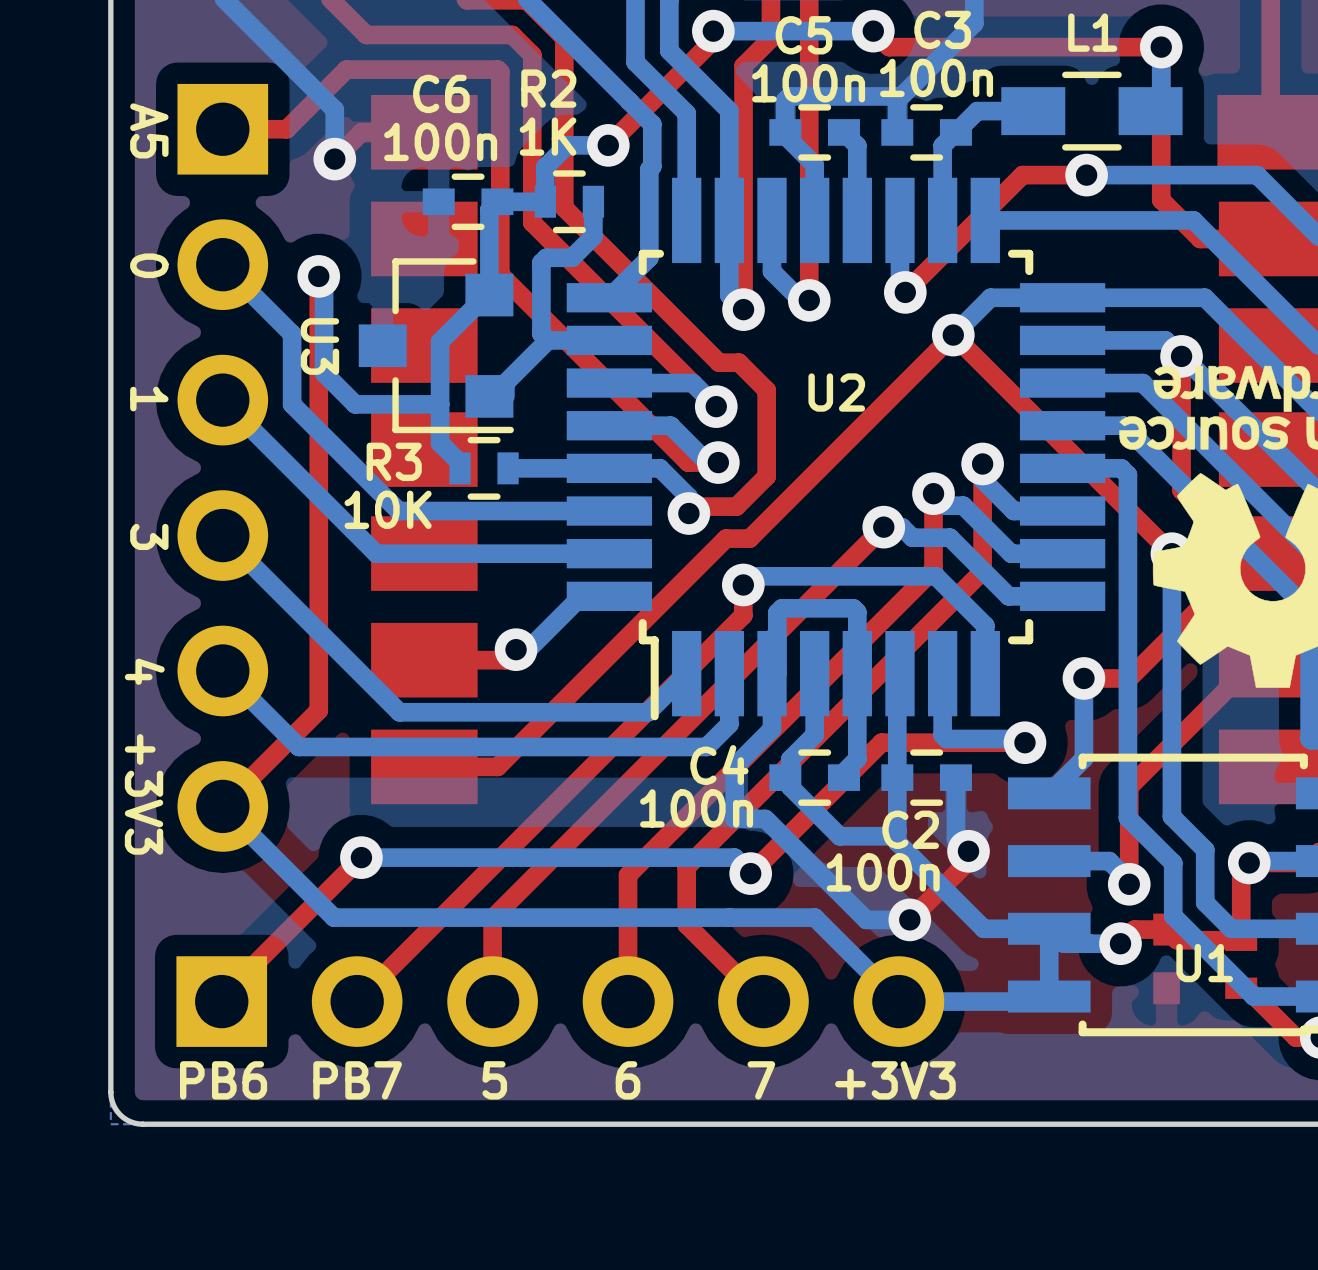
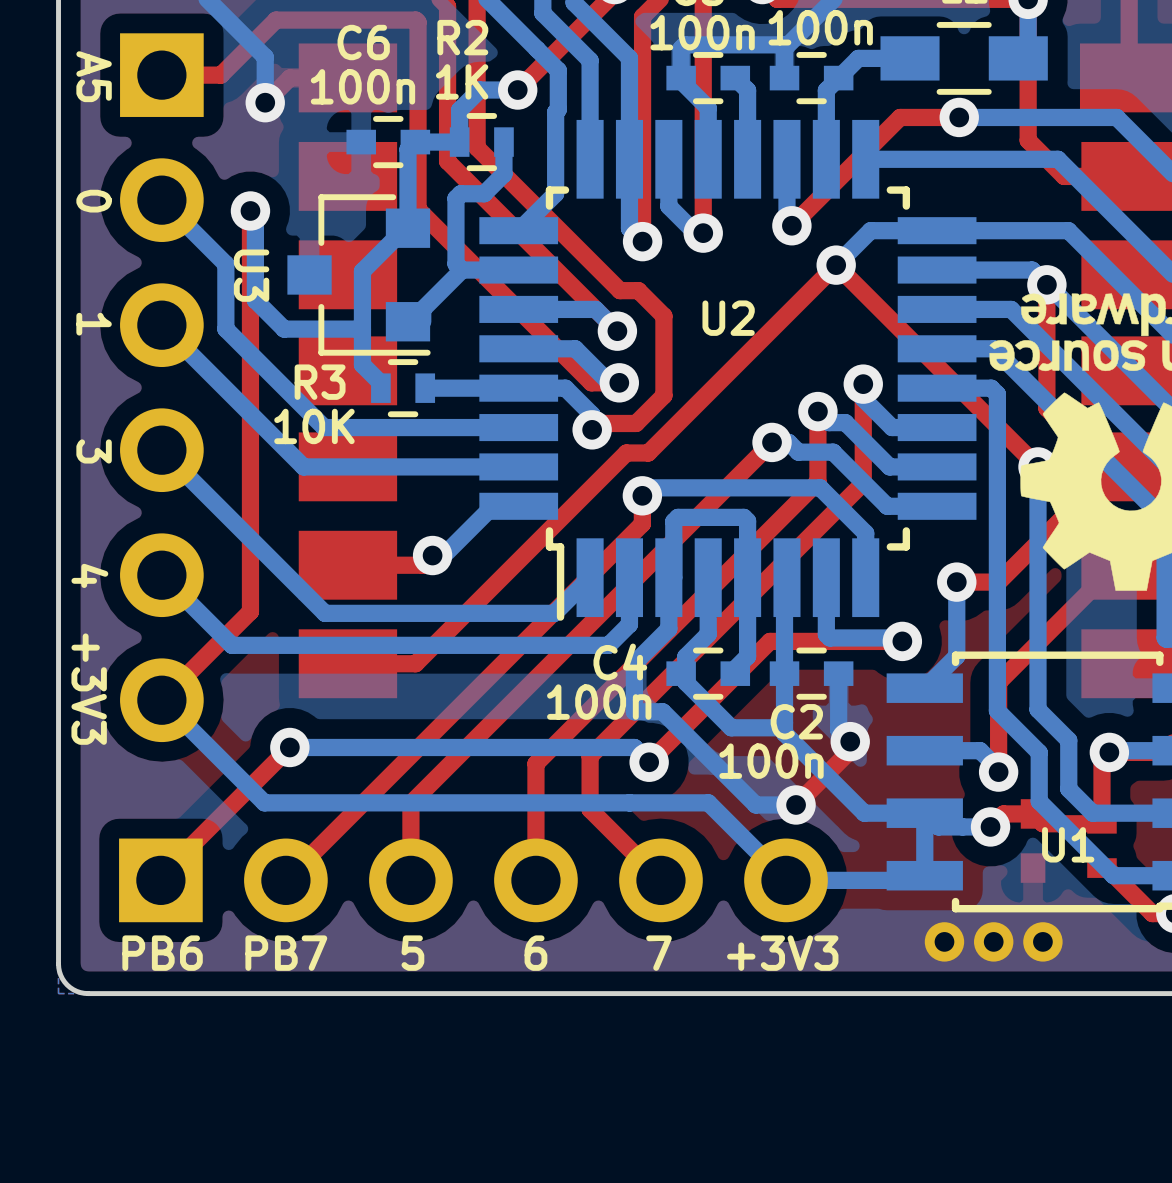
part: none -> (944, 941)
part: none -> (993, 941)
part: none -> (1042, 941)

